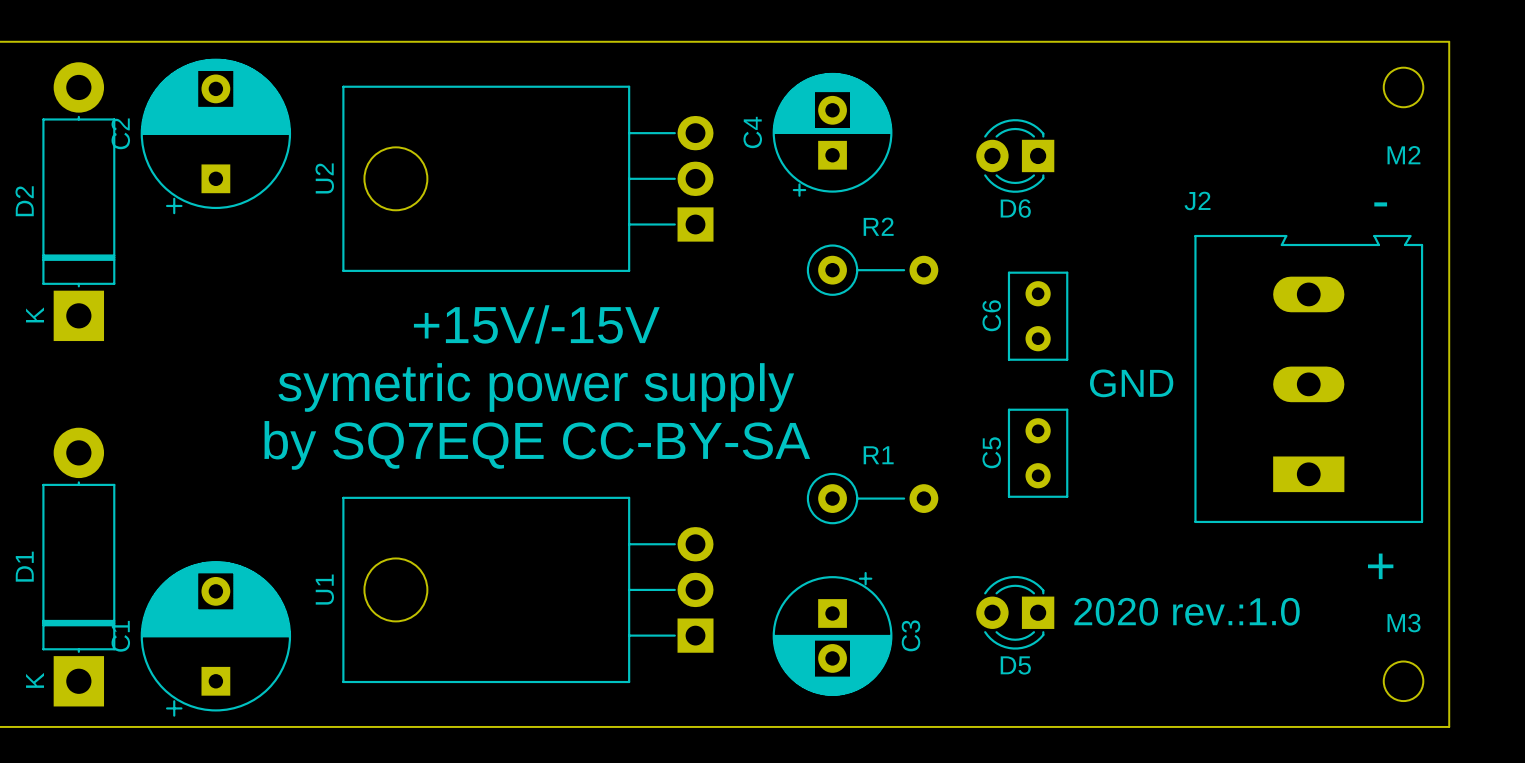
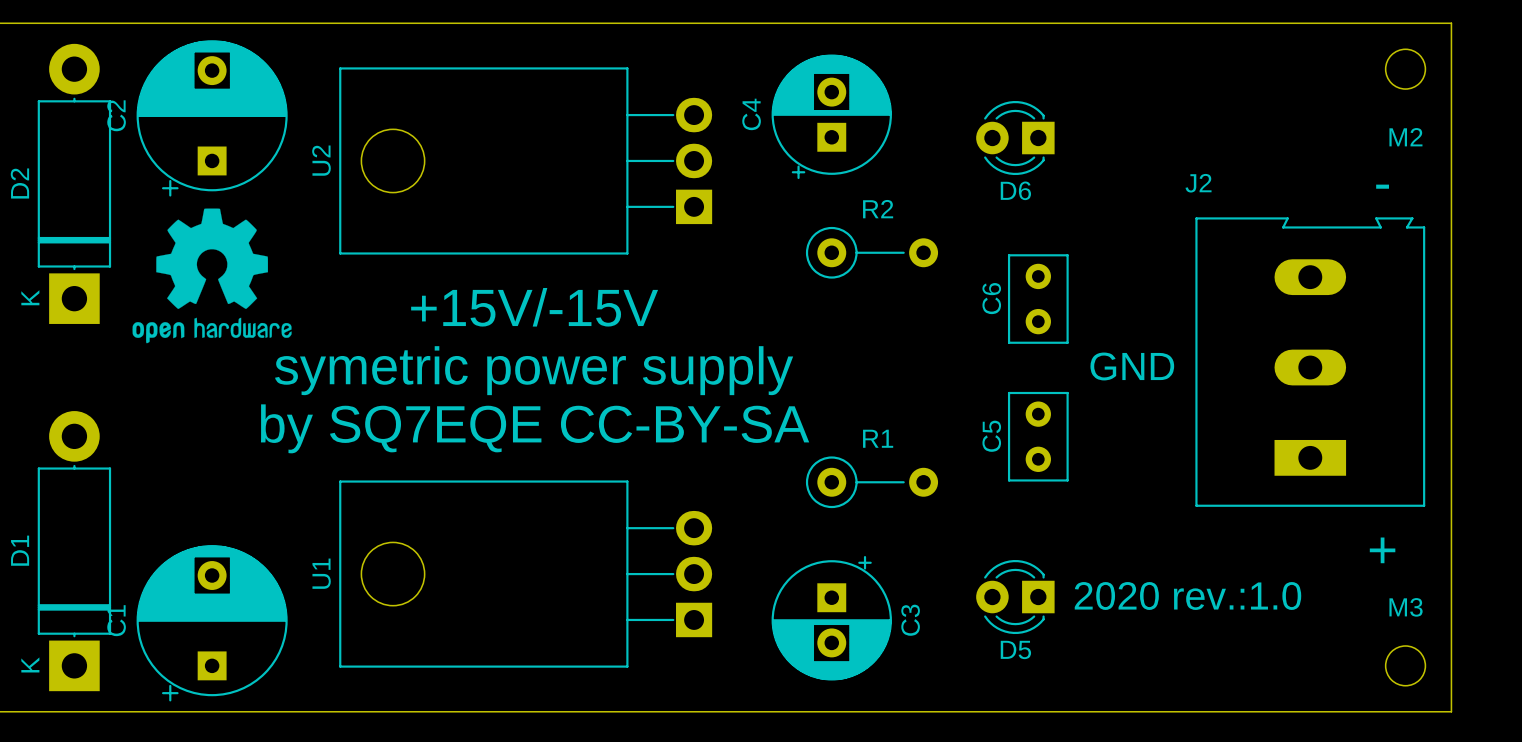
drawing: none -> [132, 208, 292, 344]

